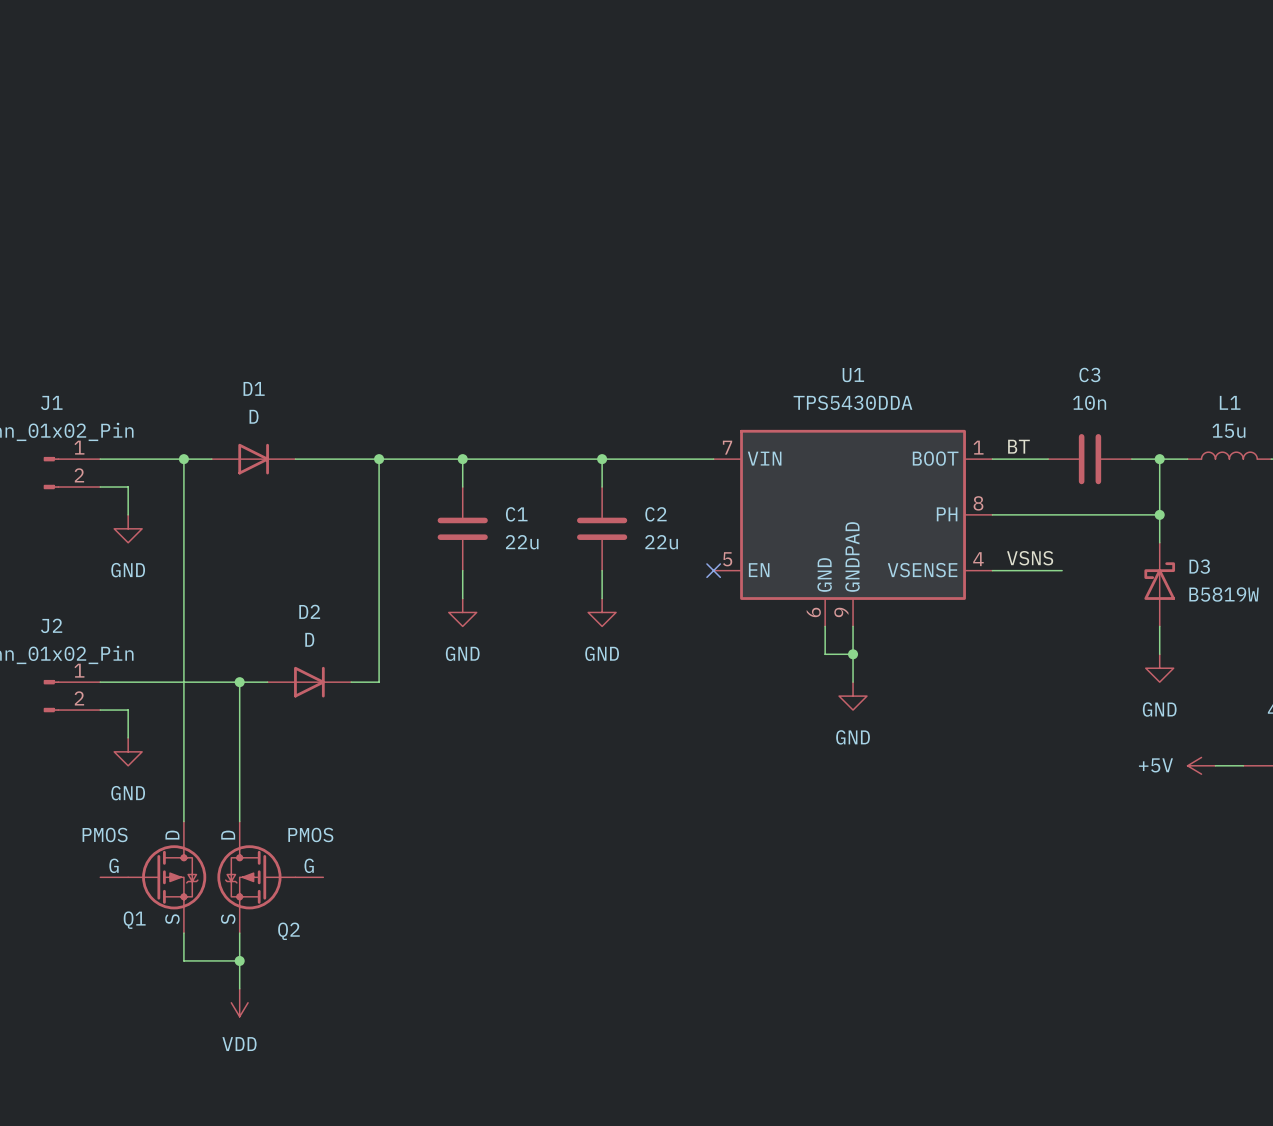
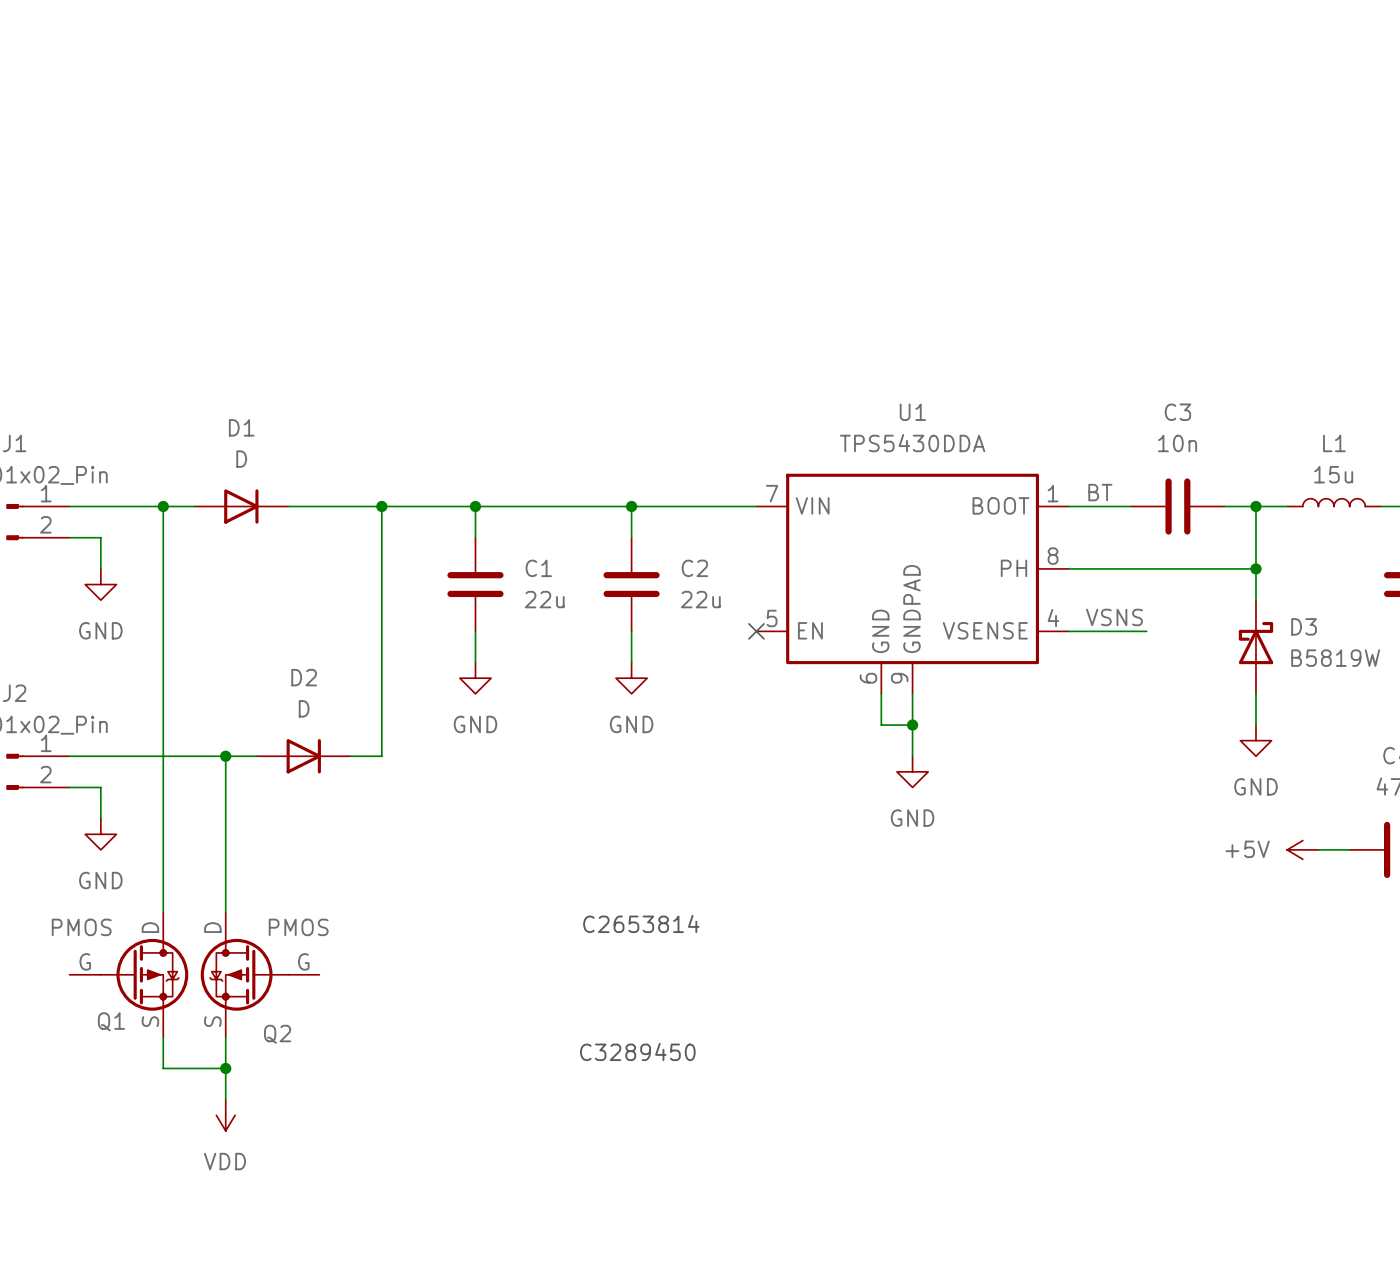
text: none -> C2653814 (641, 923)
text: none -> C3289450 (637, 1051)

